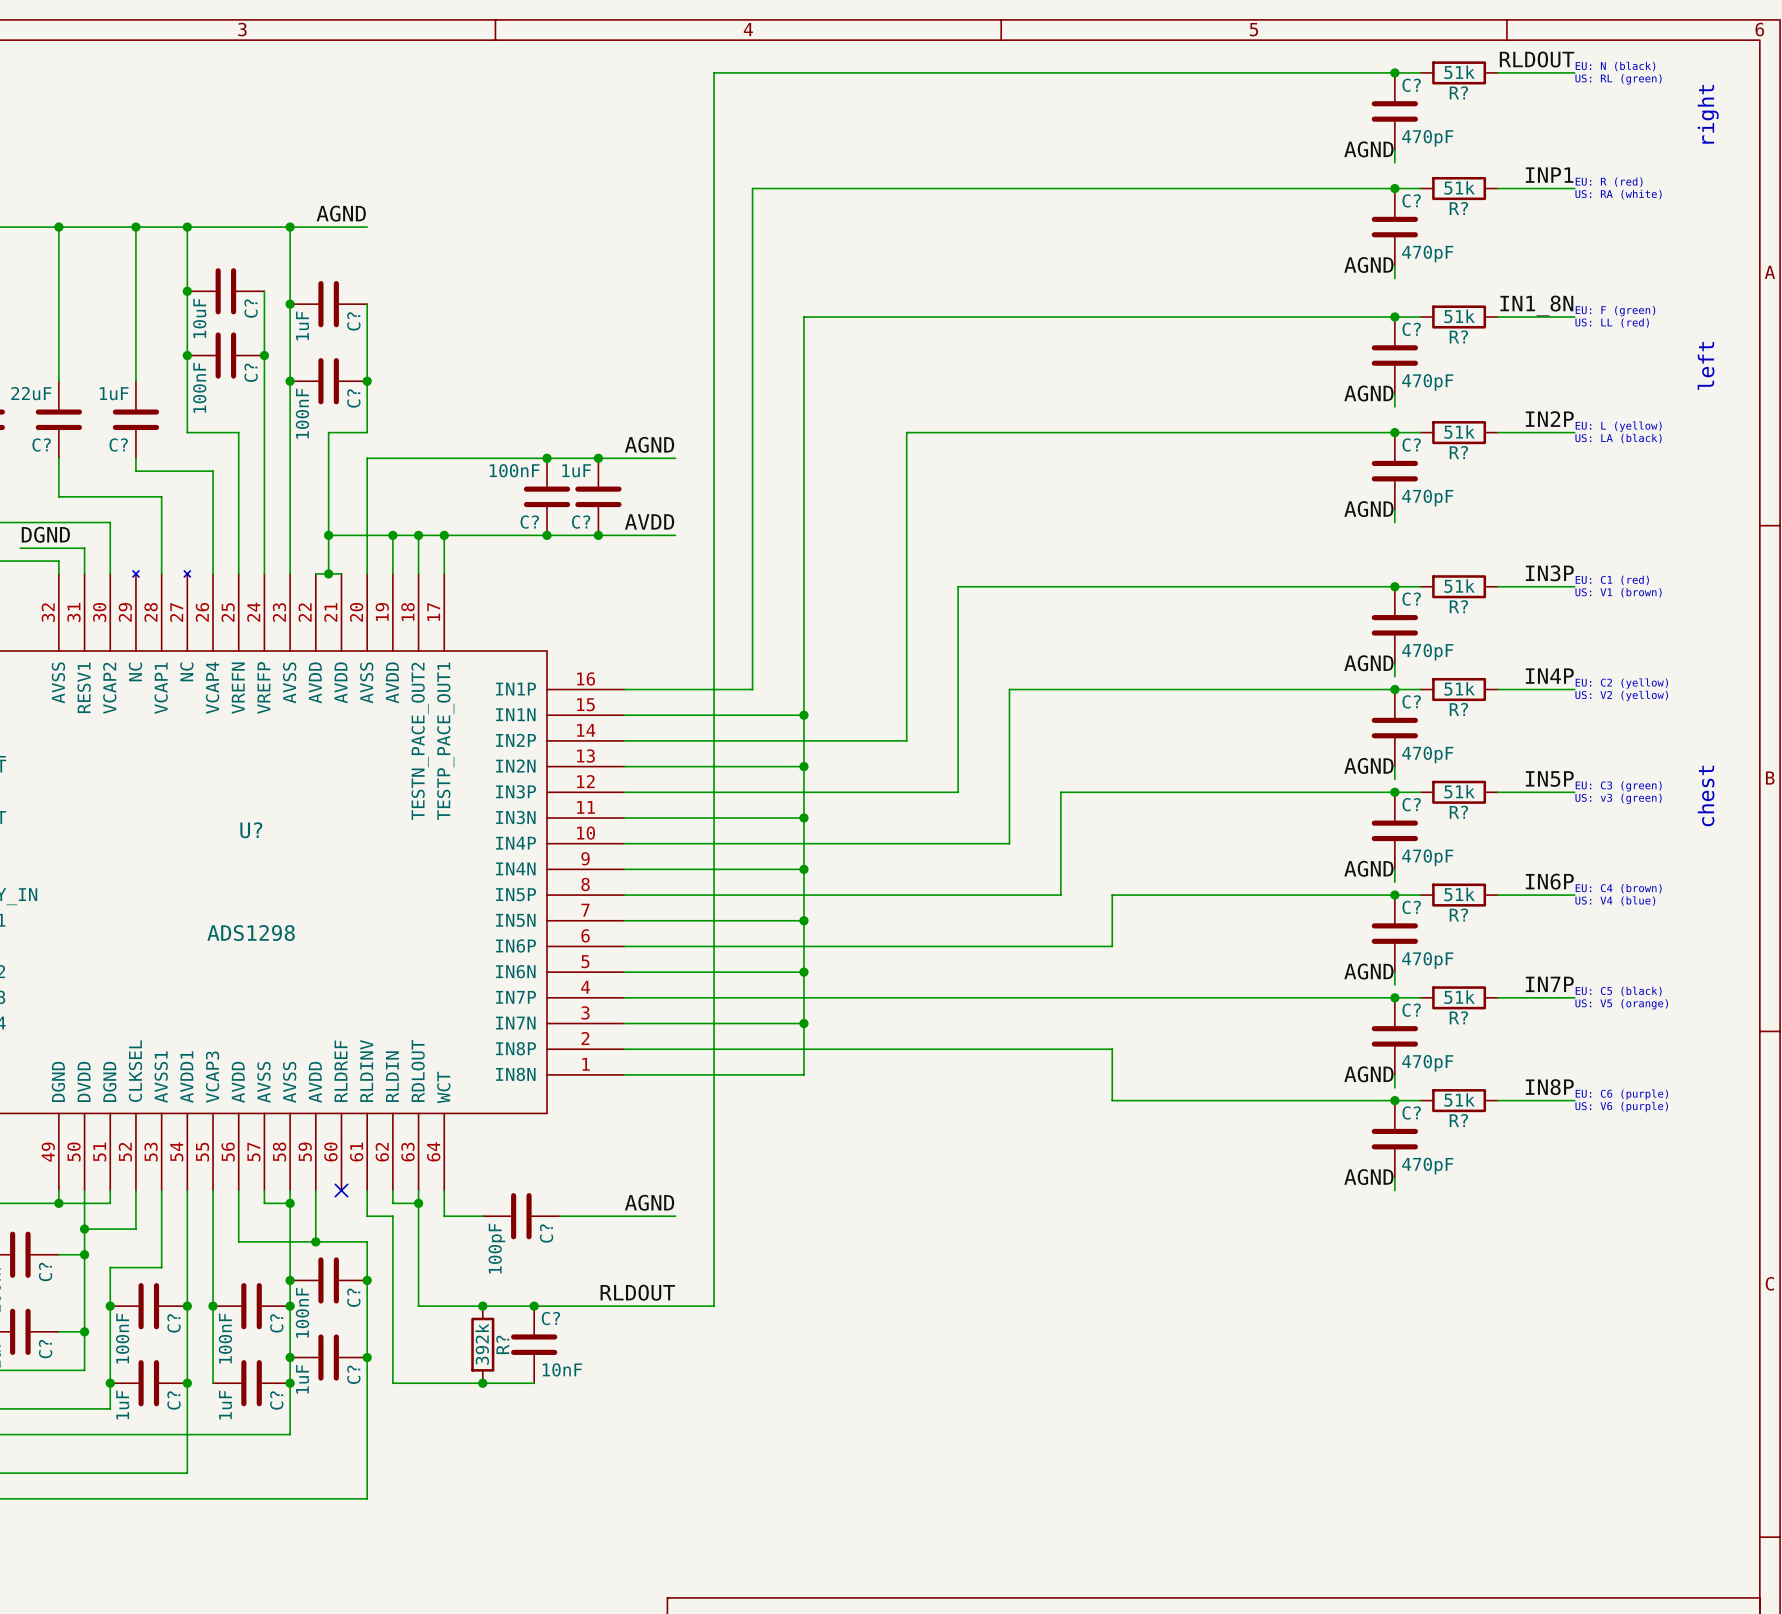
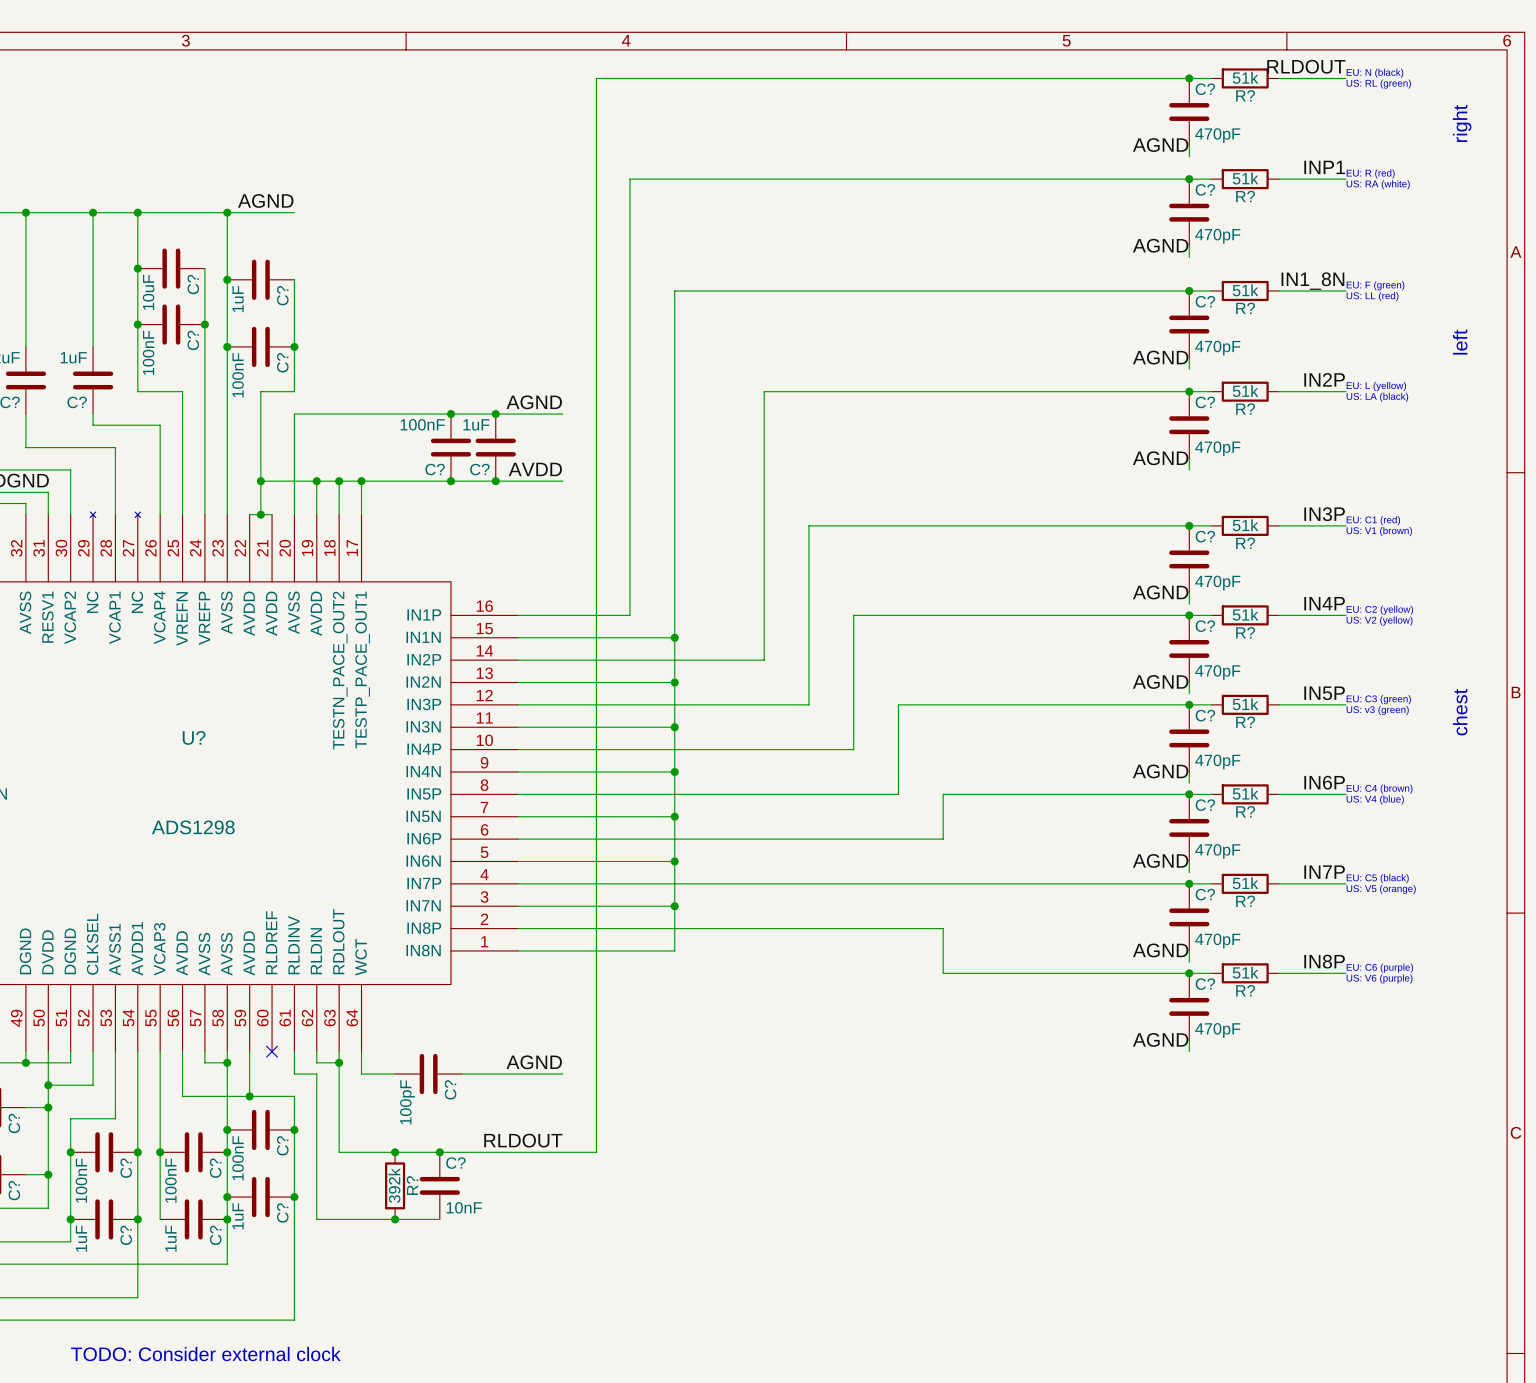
text: none -> TODO: Consider external clock (205, 1354)

